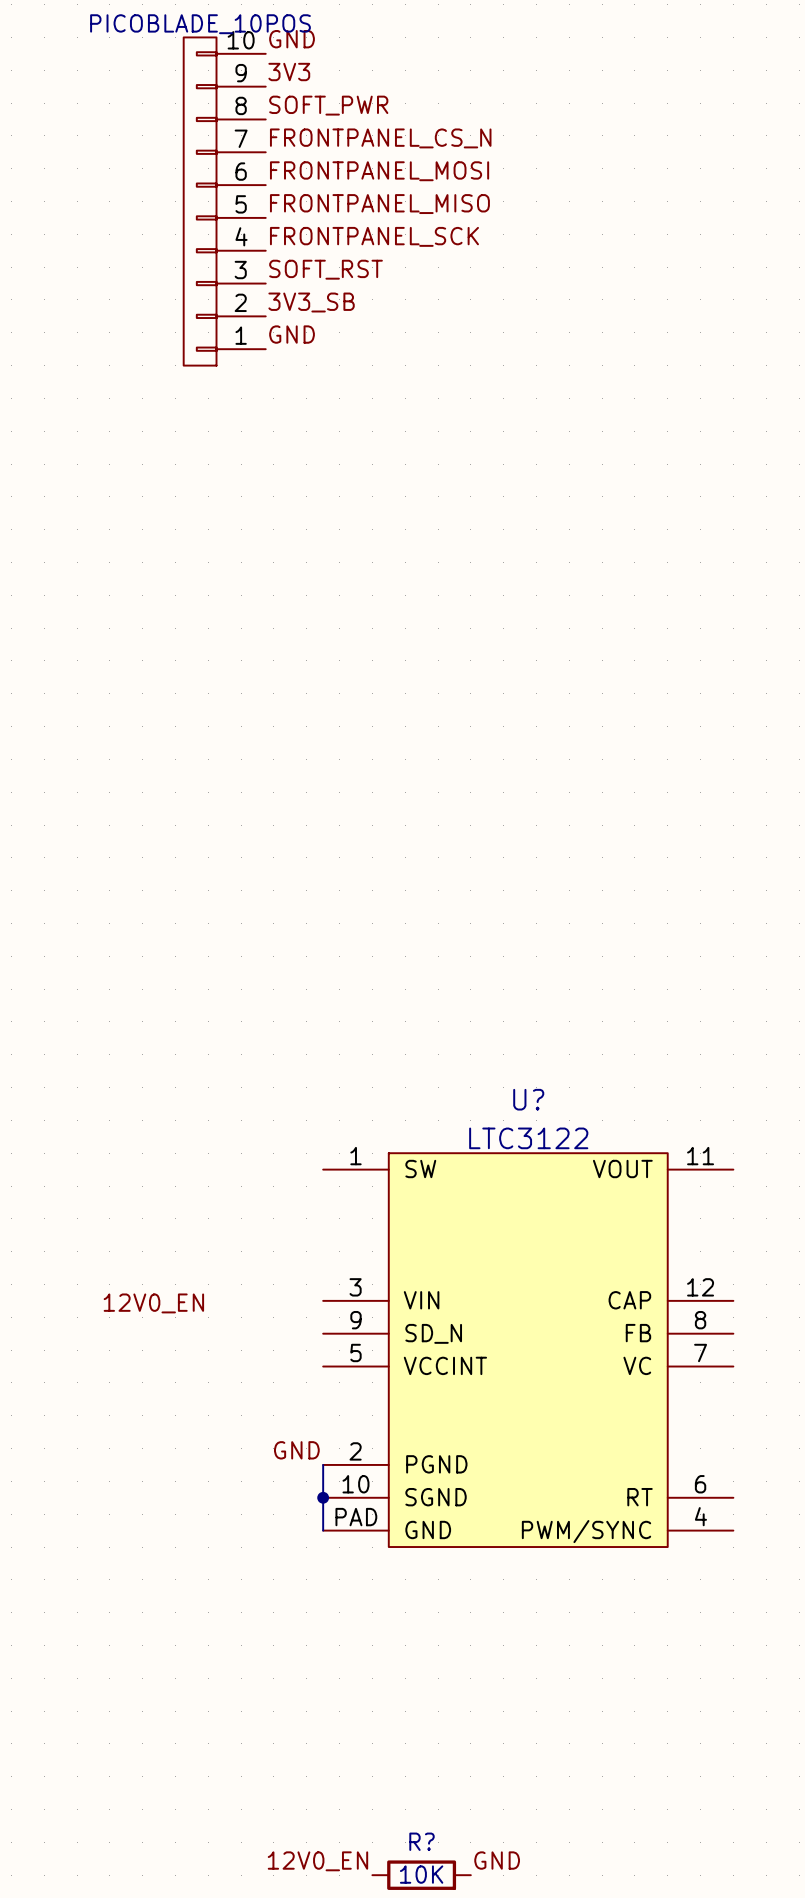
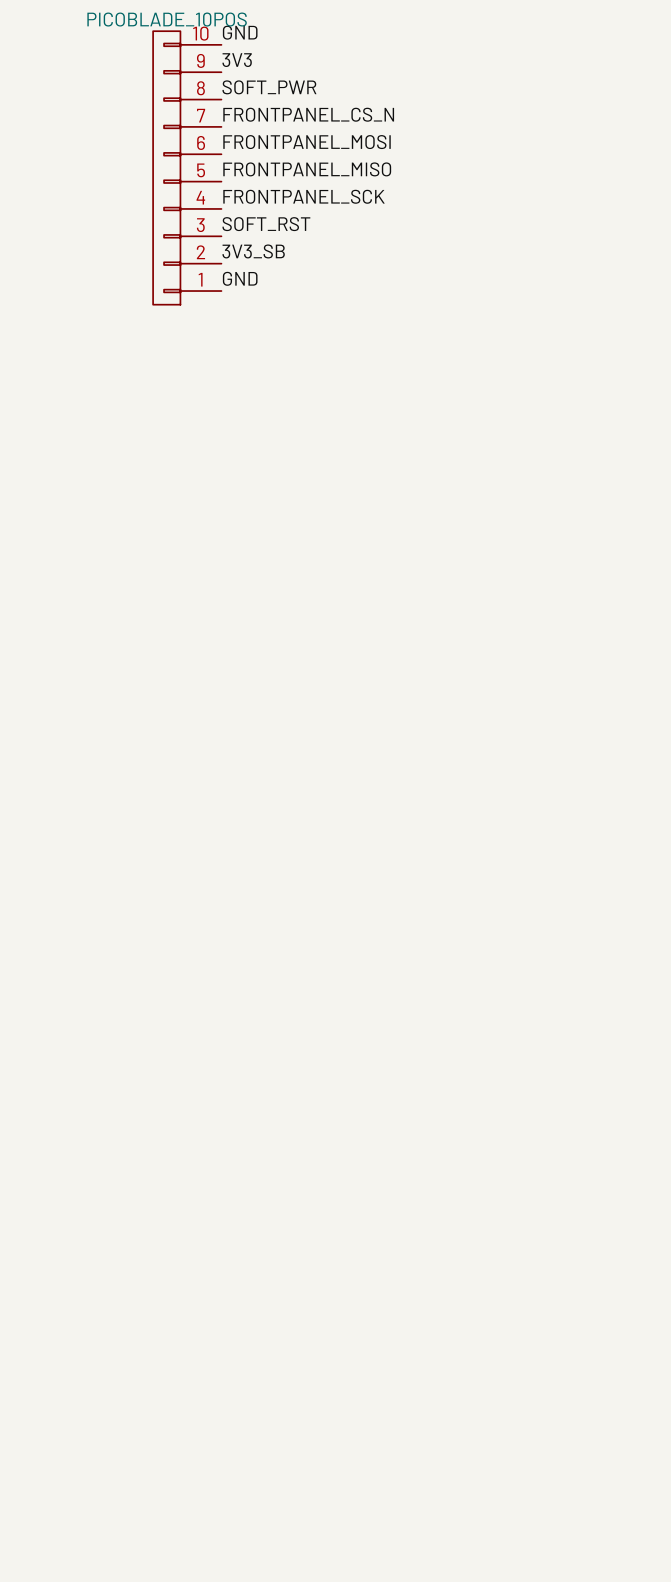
label: 12V0_EN (153, 1303) -> none
U?: LTC3122 (528, 1350) -> none
label: GND (296, 1450) -> none
wire: (323, 1464) (323, 1530) -> none
junction: (323, 1497) -> none
label: GND (497, 1860) -> none
label: 12V0_EN (317, 1861) -> none
R?: 10K (421, 1875) -> none

